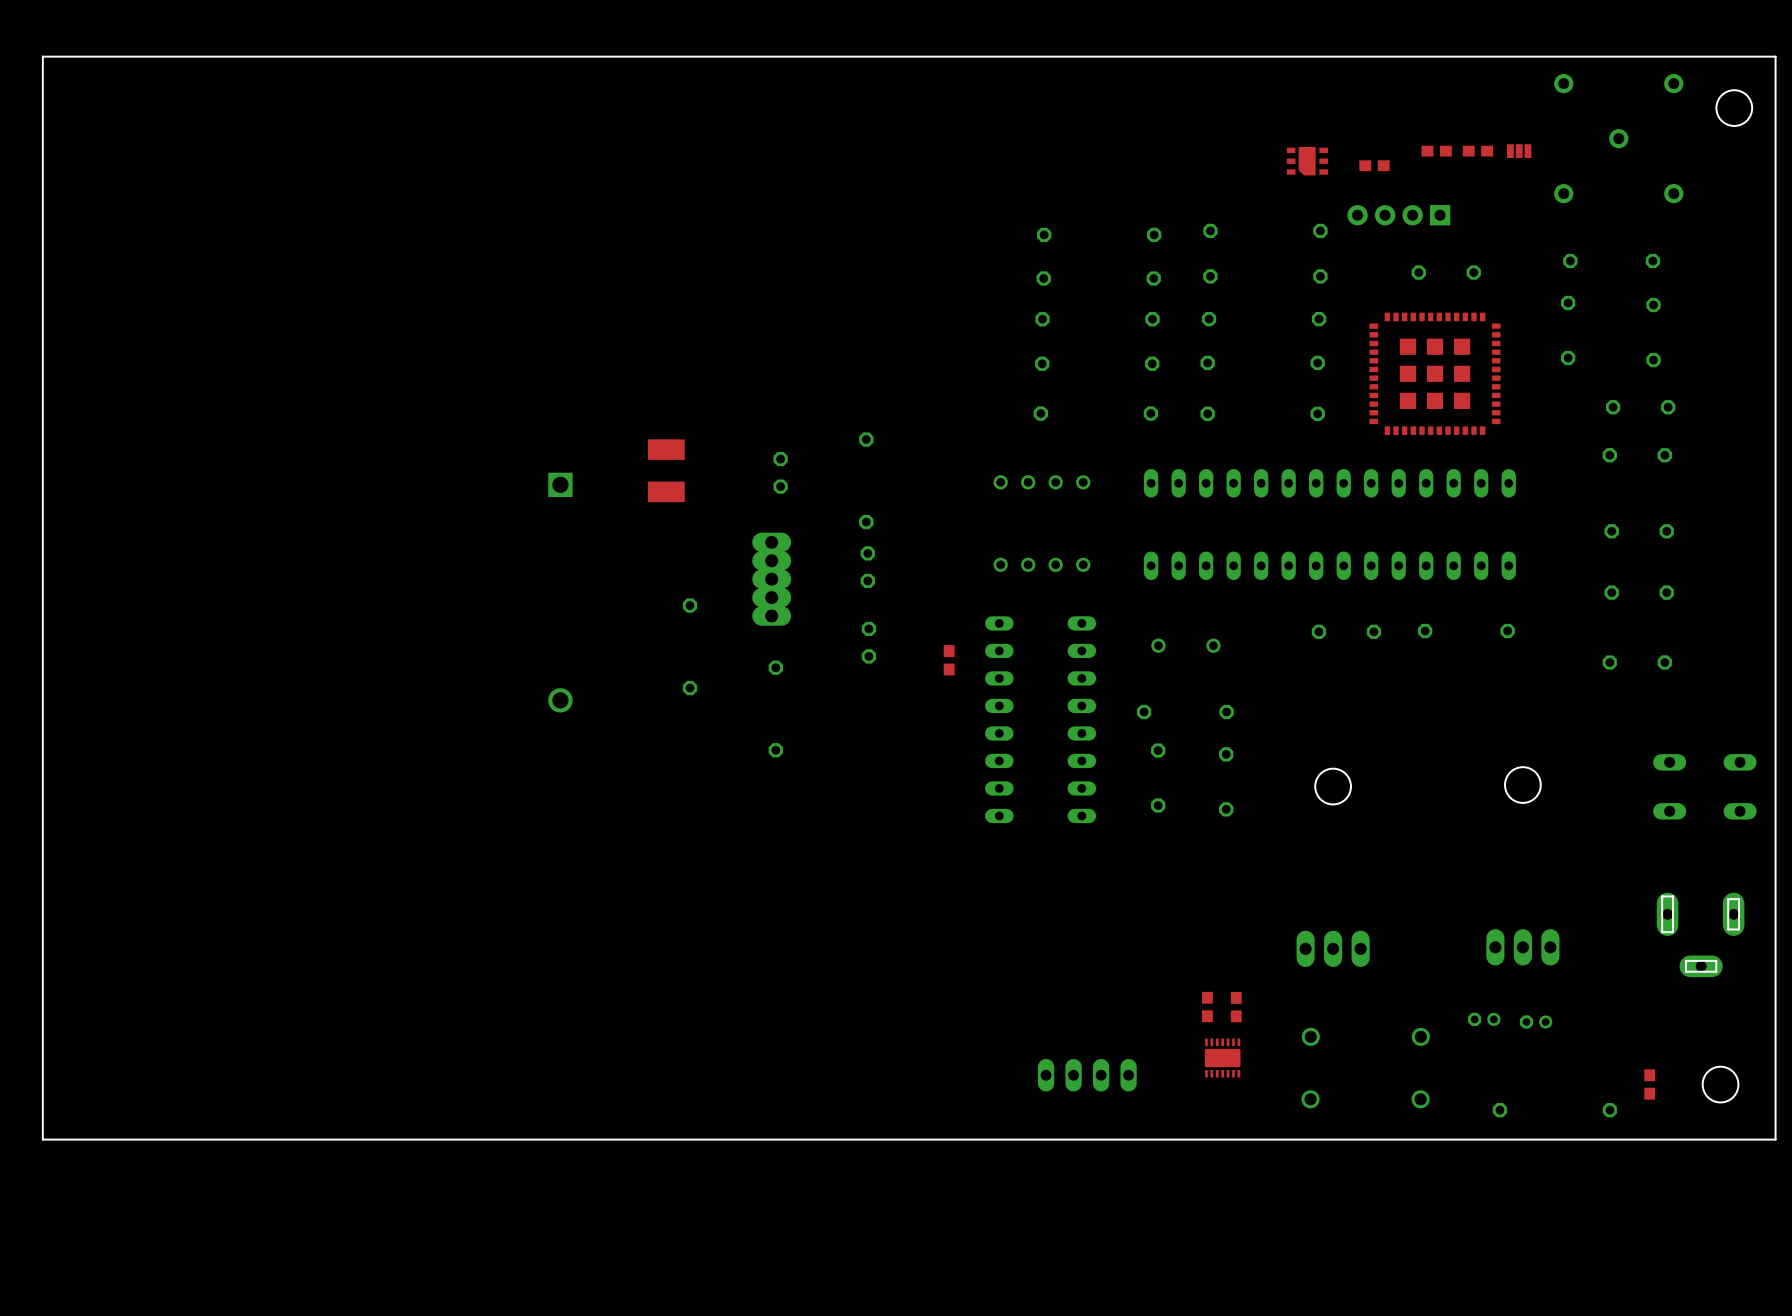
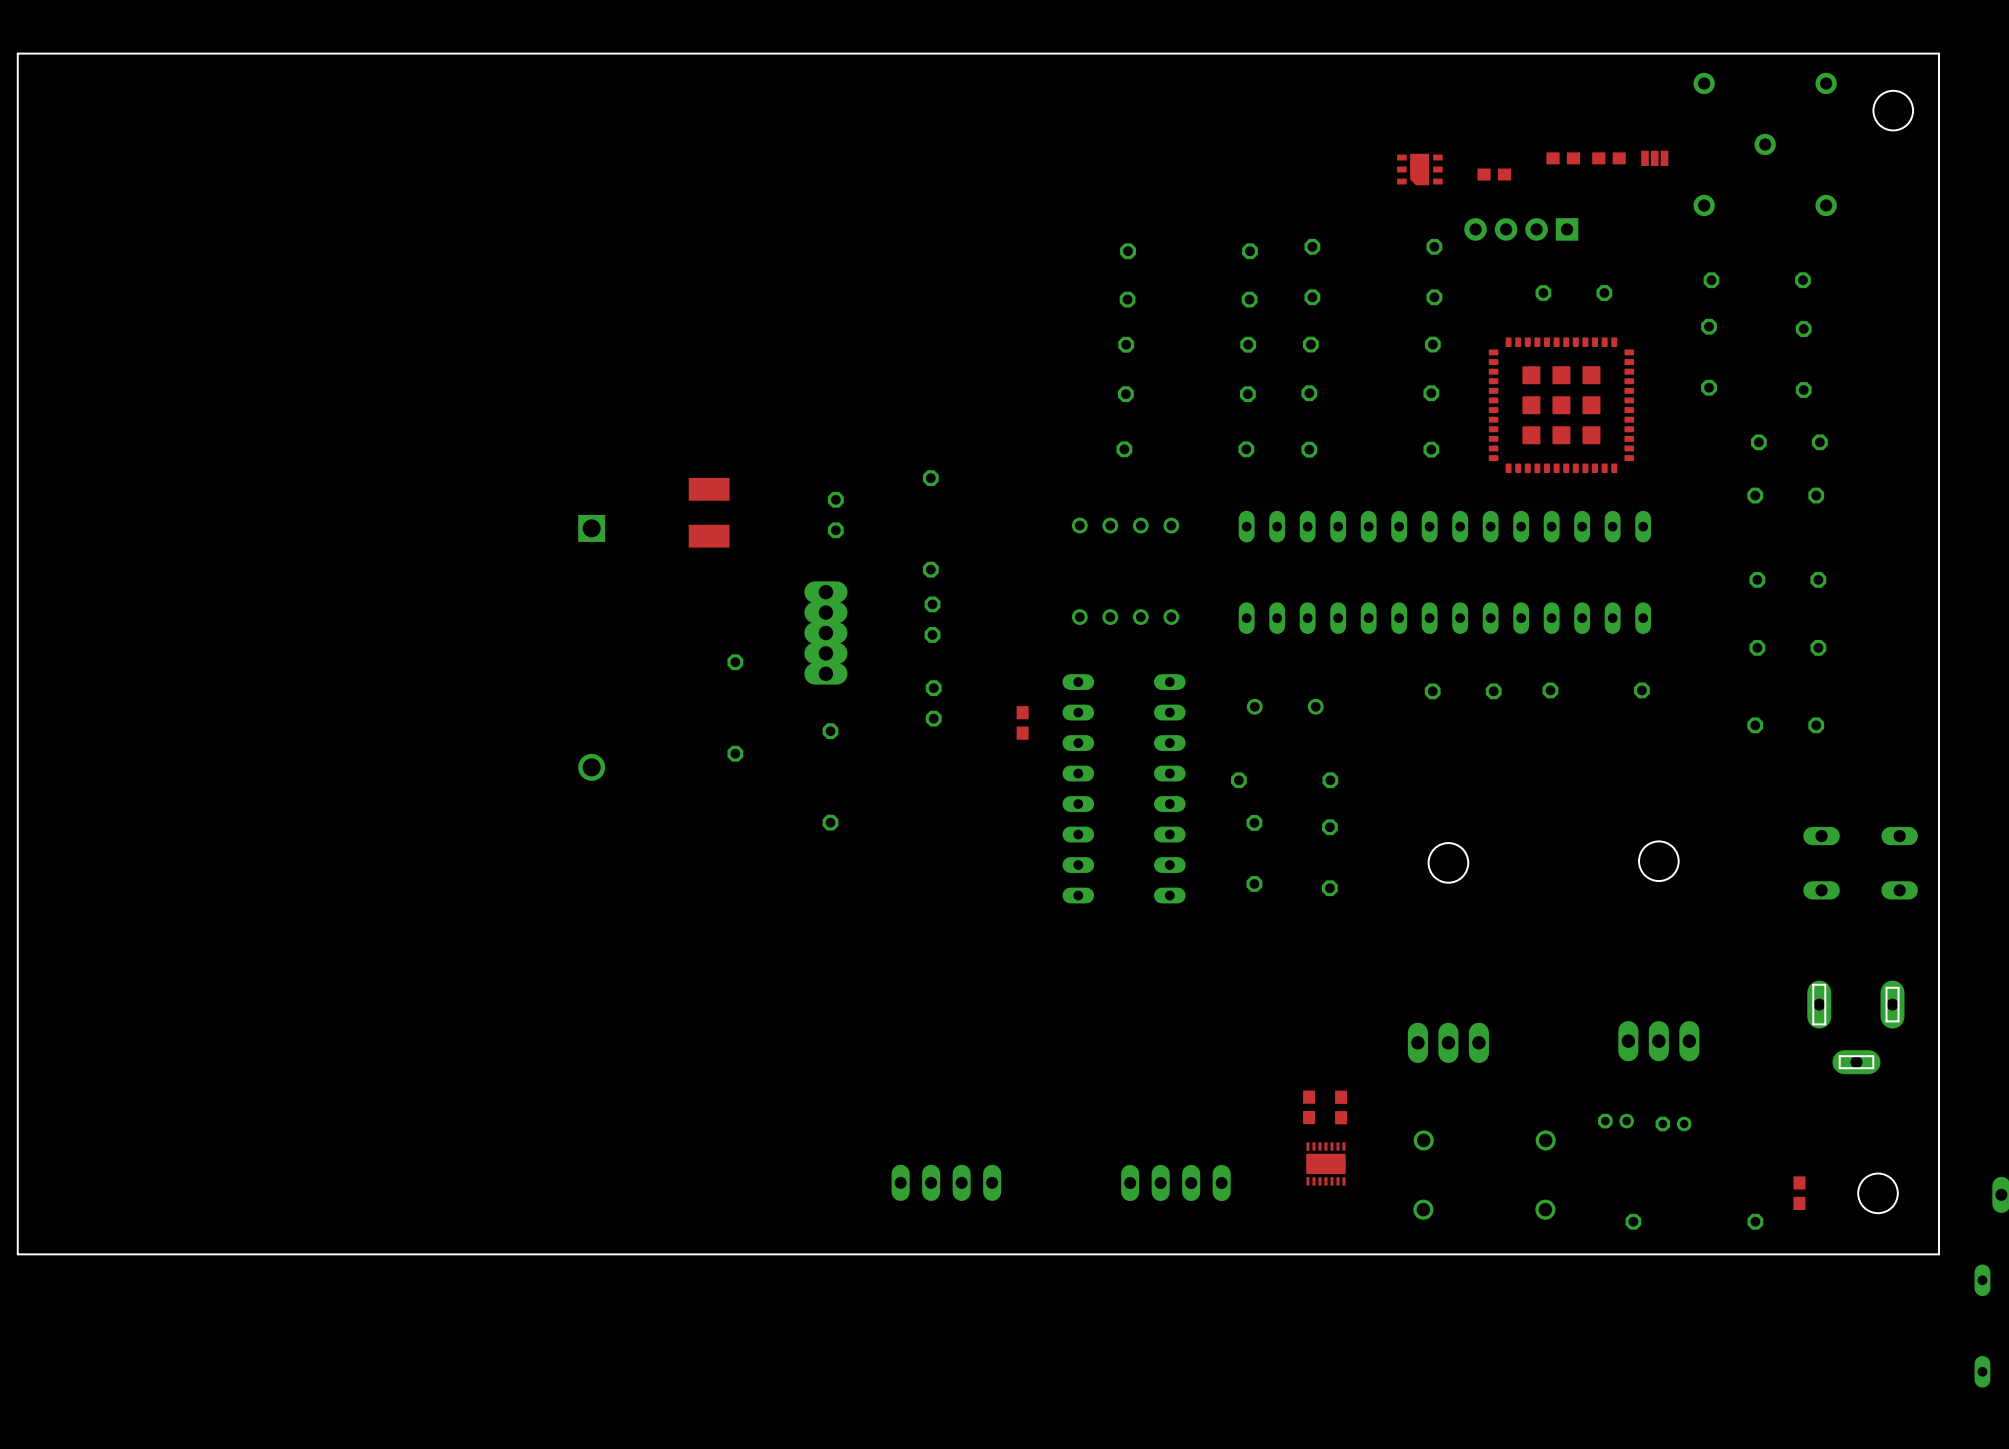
part: none -> (946, 1182)

